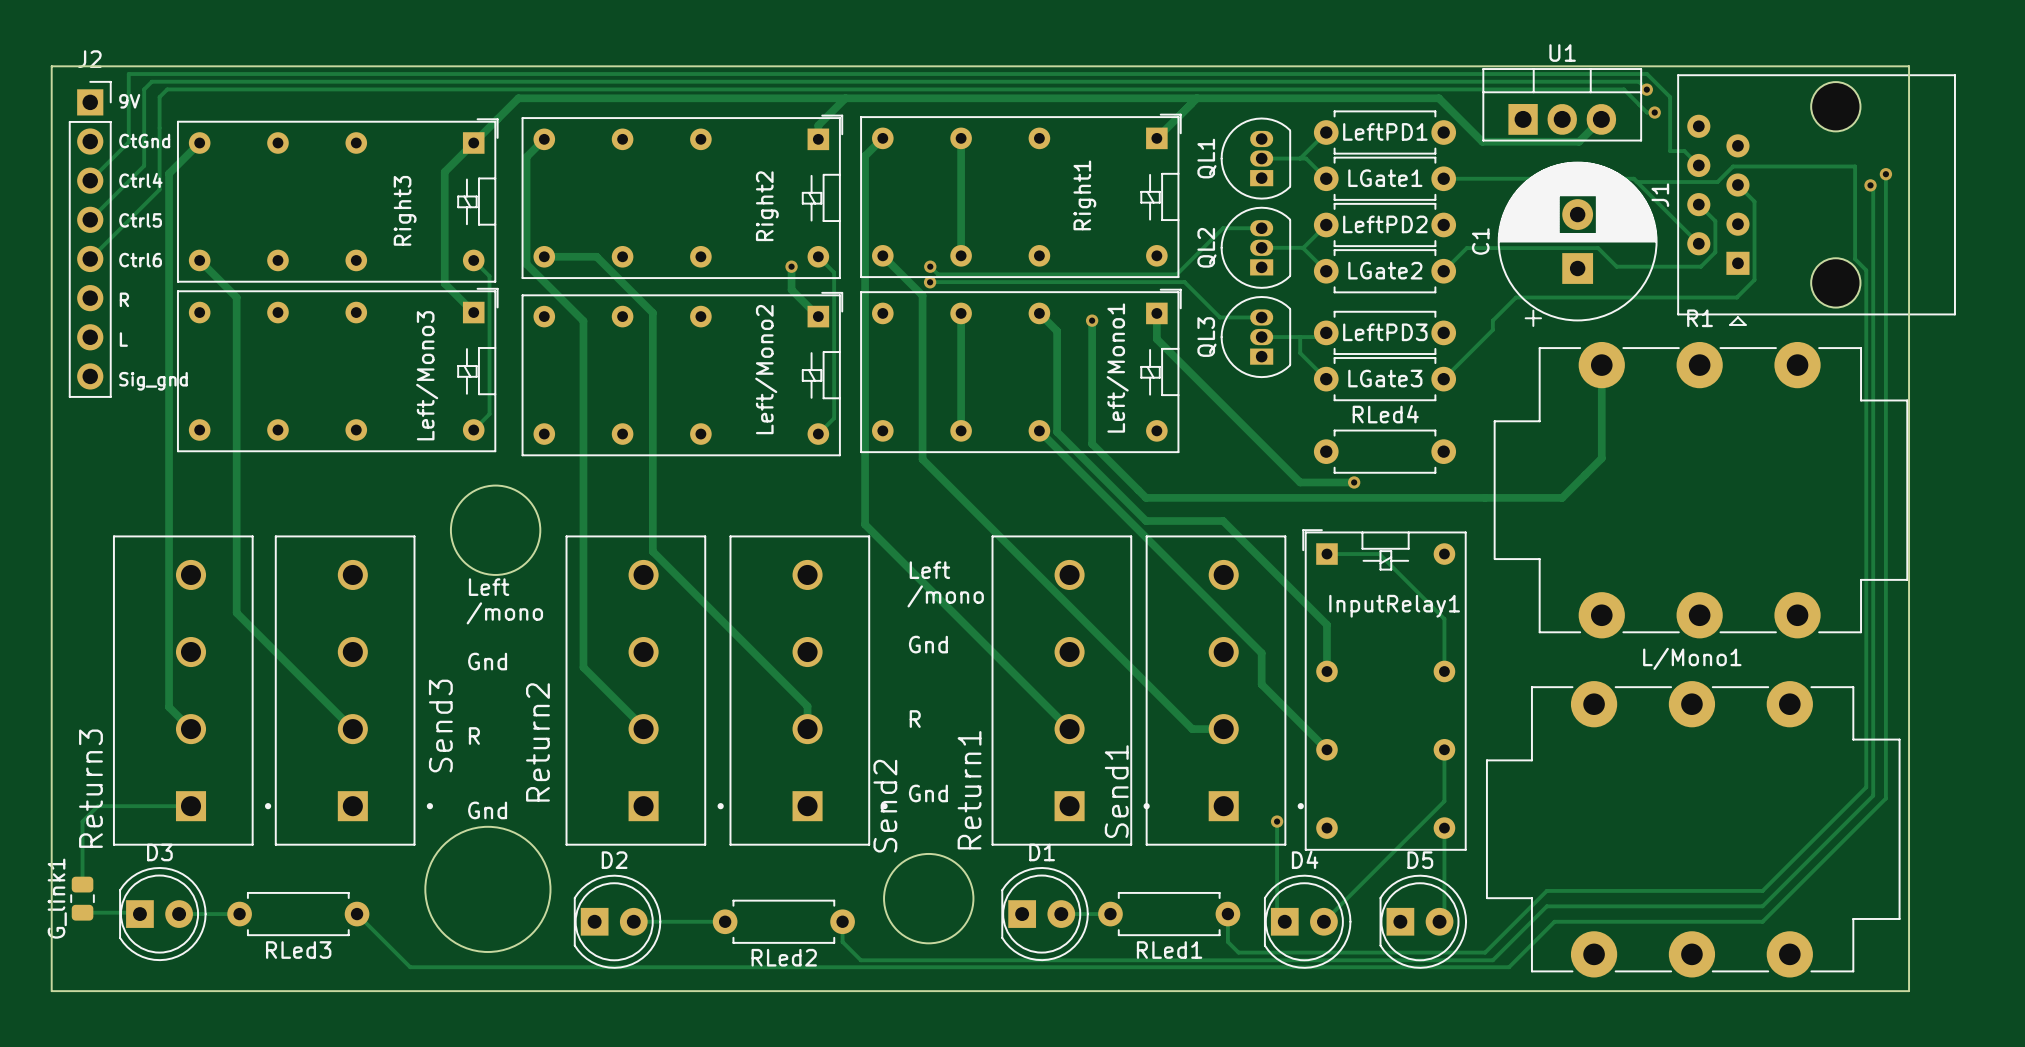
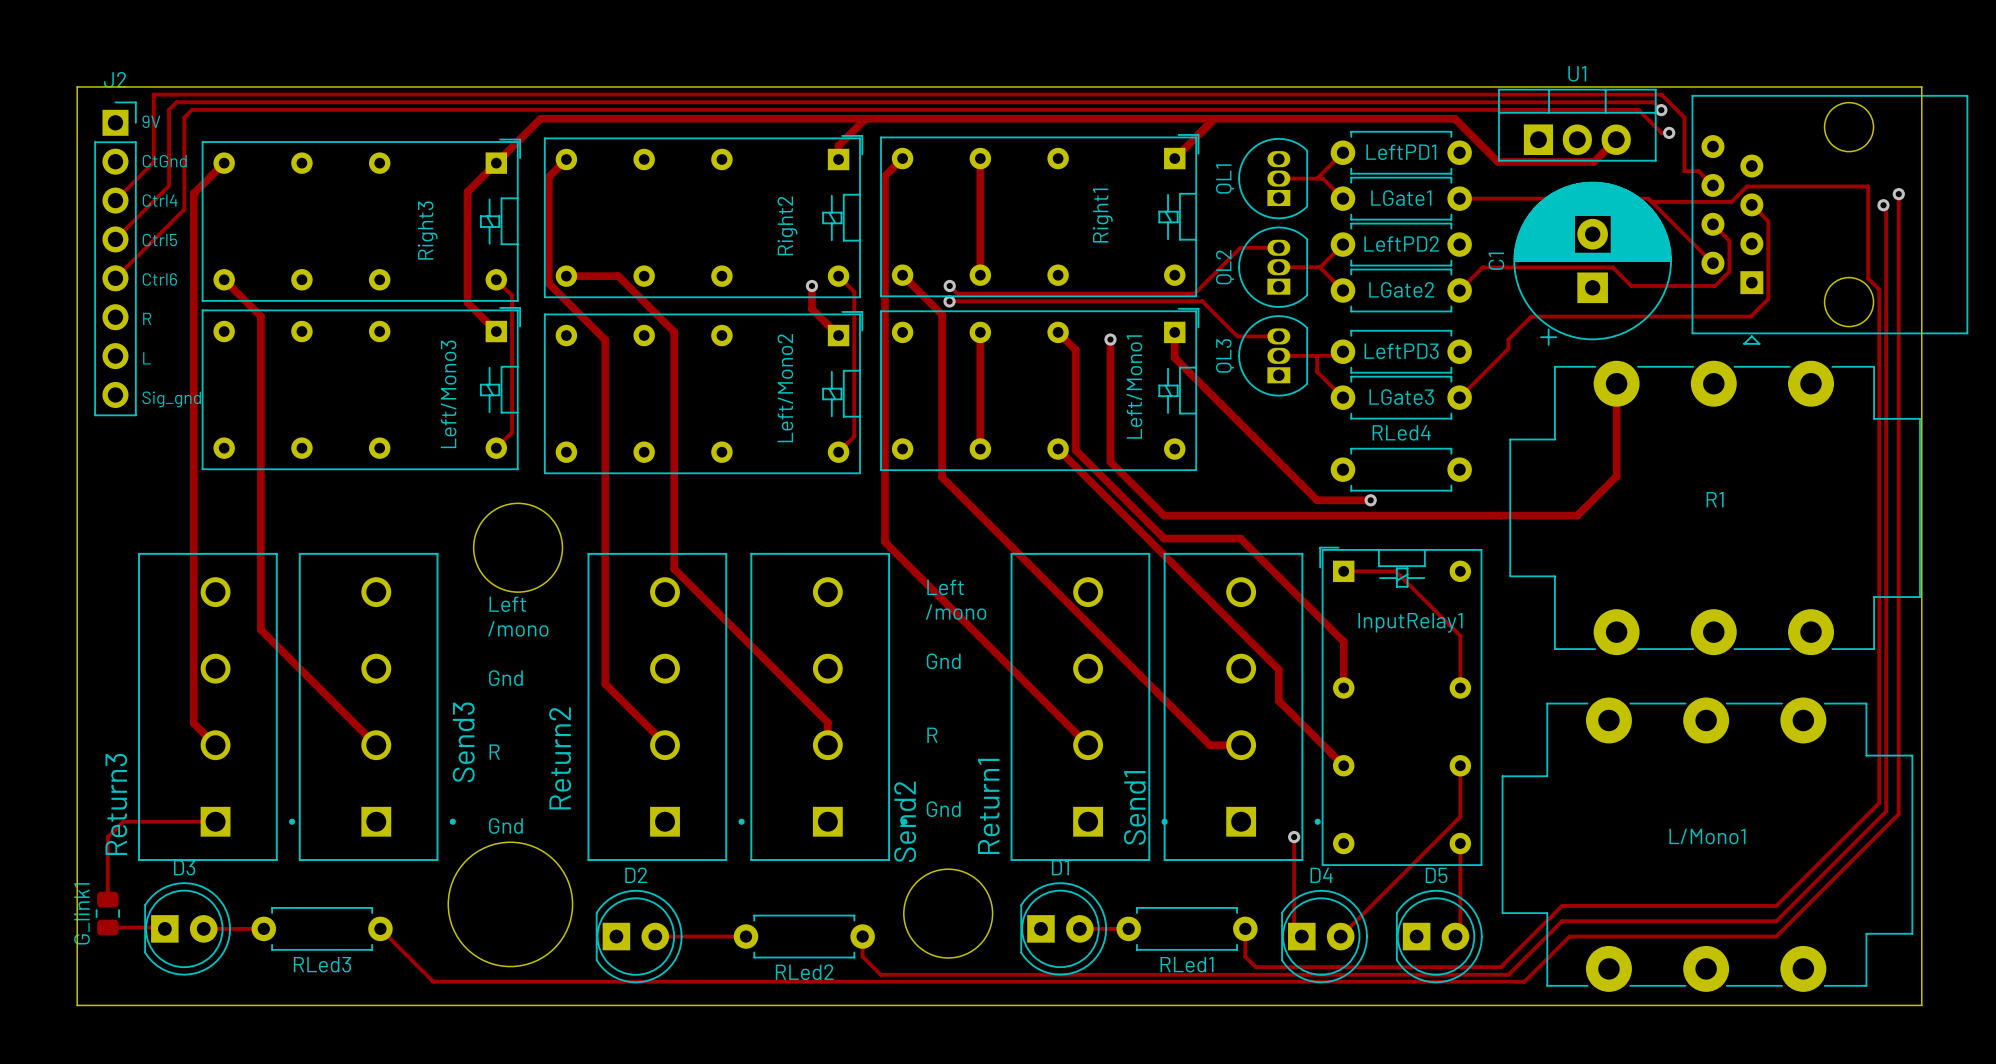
J1 name: J1 (1660, 195) -> none
R1 name position: R1 (1700, 318) -> R1 (1715, 499)
L/Mono1 name position: L/Mono1 (1692, 658) -> L/Mono1 (1707, 836)

